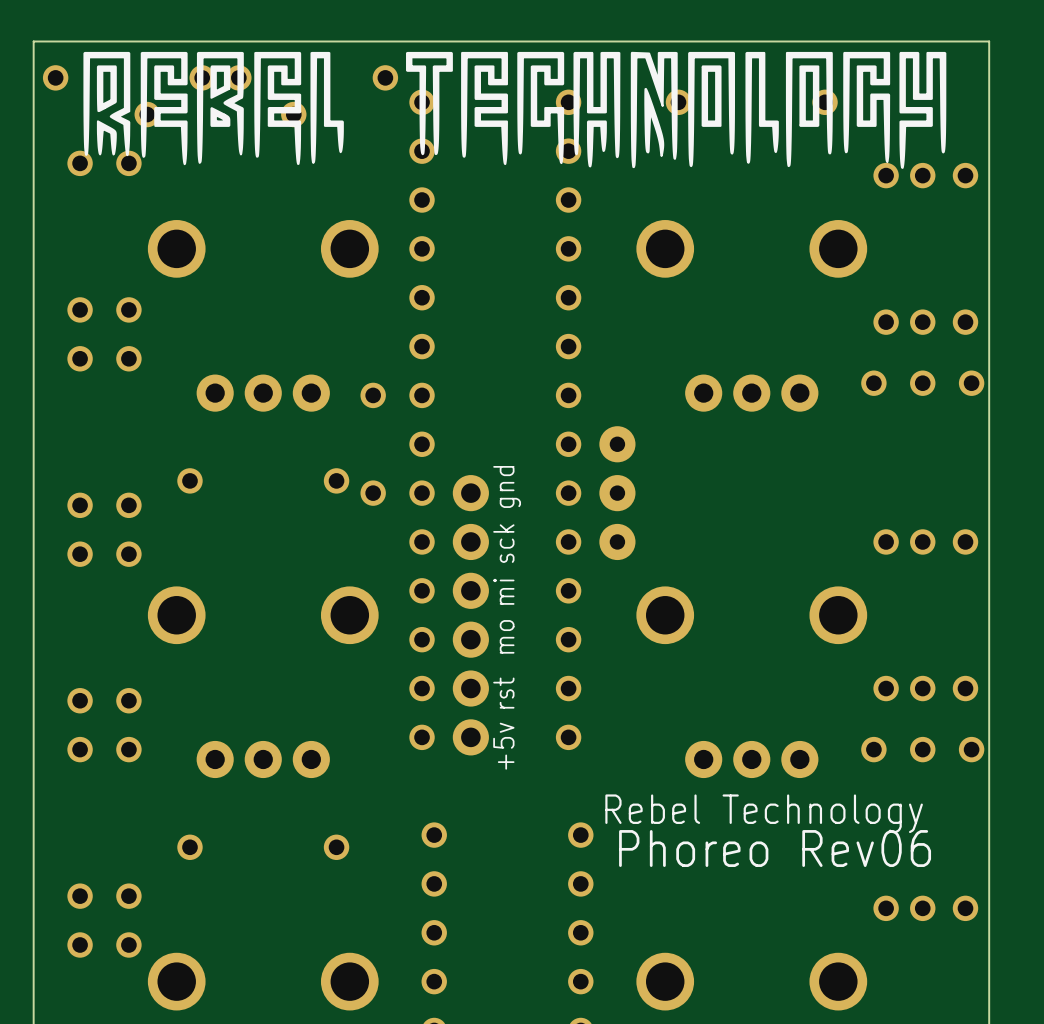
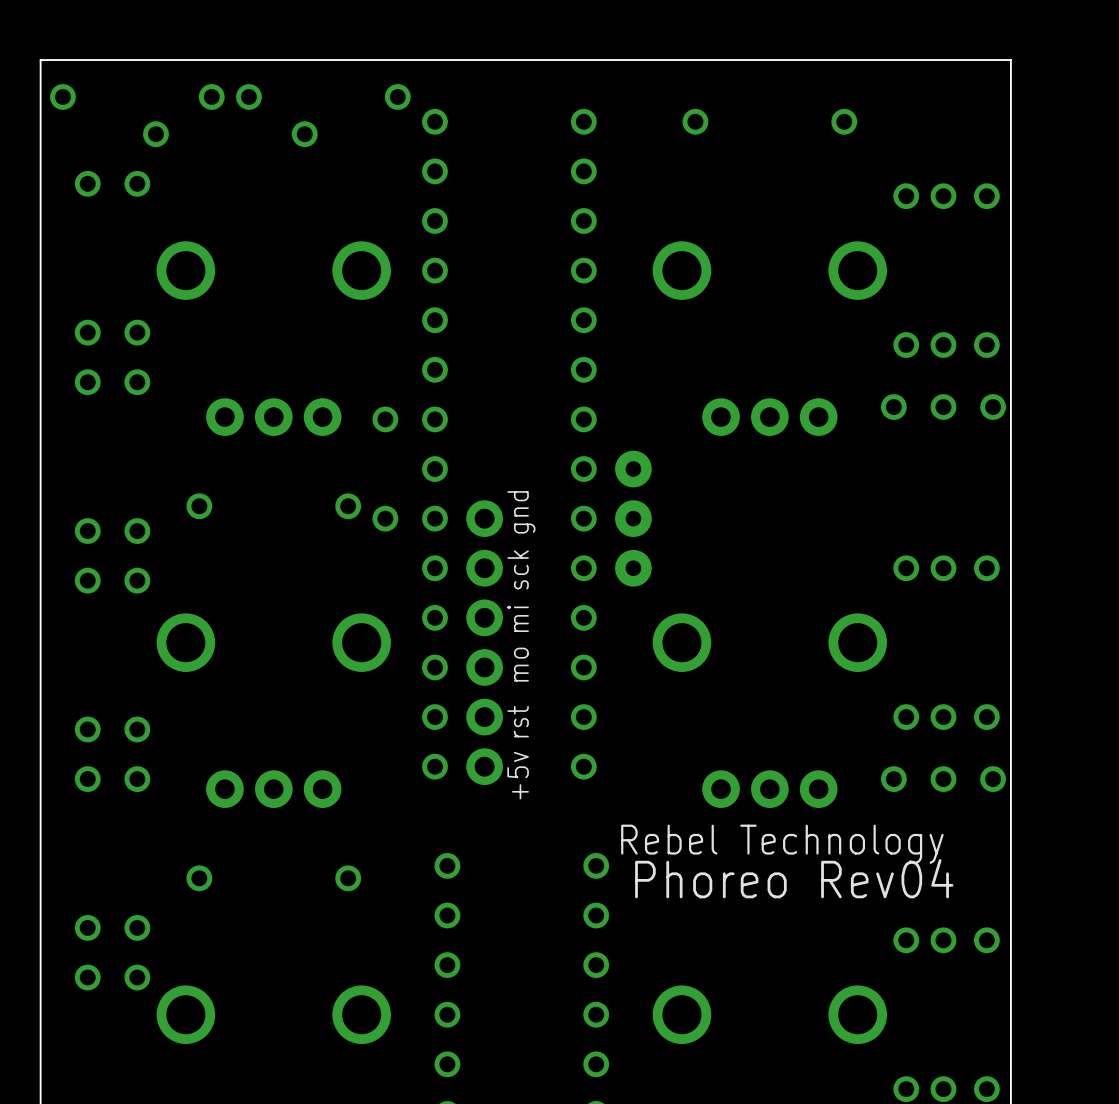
drawing: [83, 51, 344, 166] -> none
drawing: [406, 51, 947, 169] -> none
text: Phoreo Rev06 (775, 848) -> Phoreo Rev04 (794, 878)

